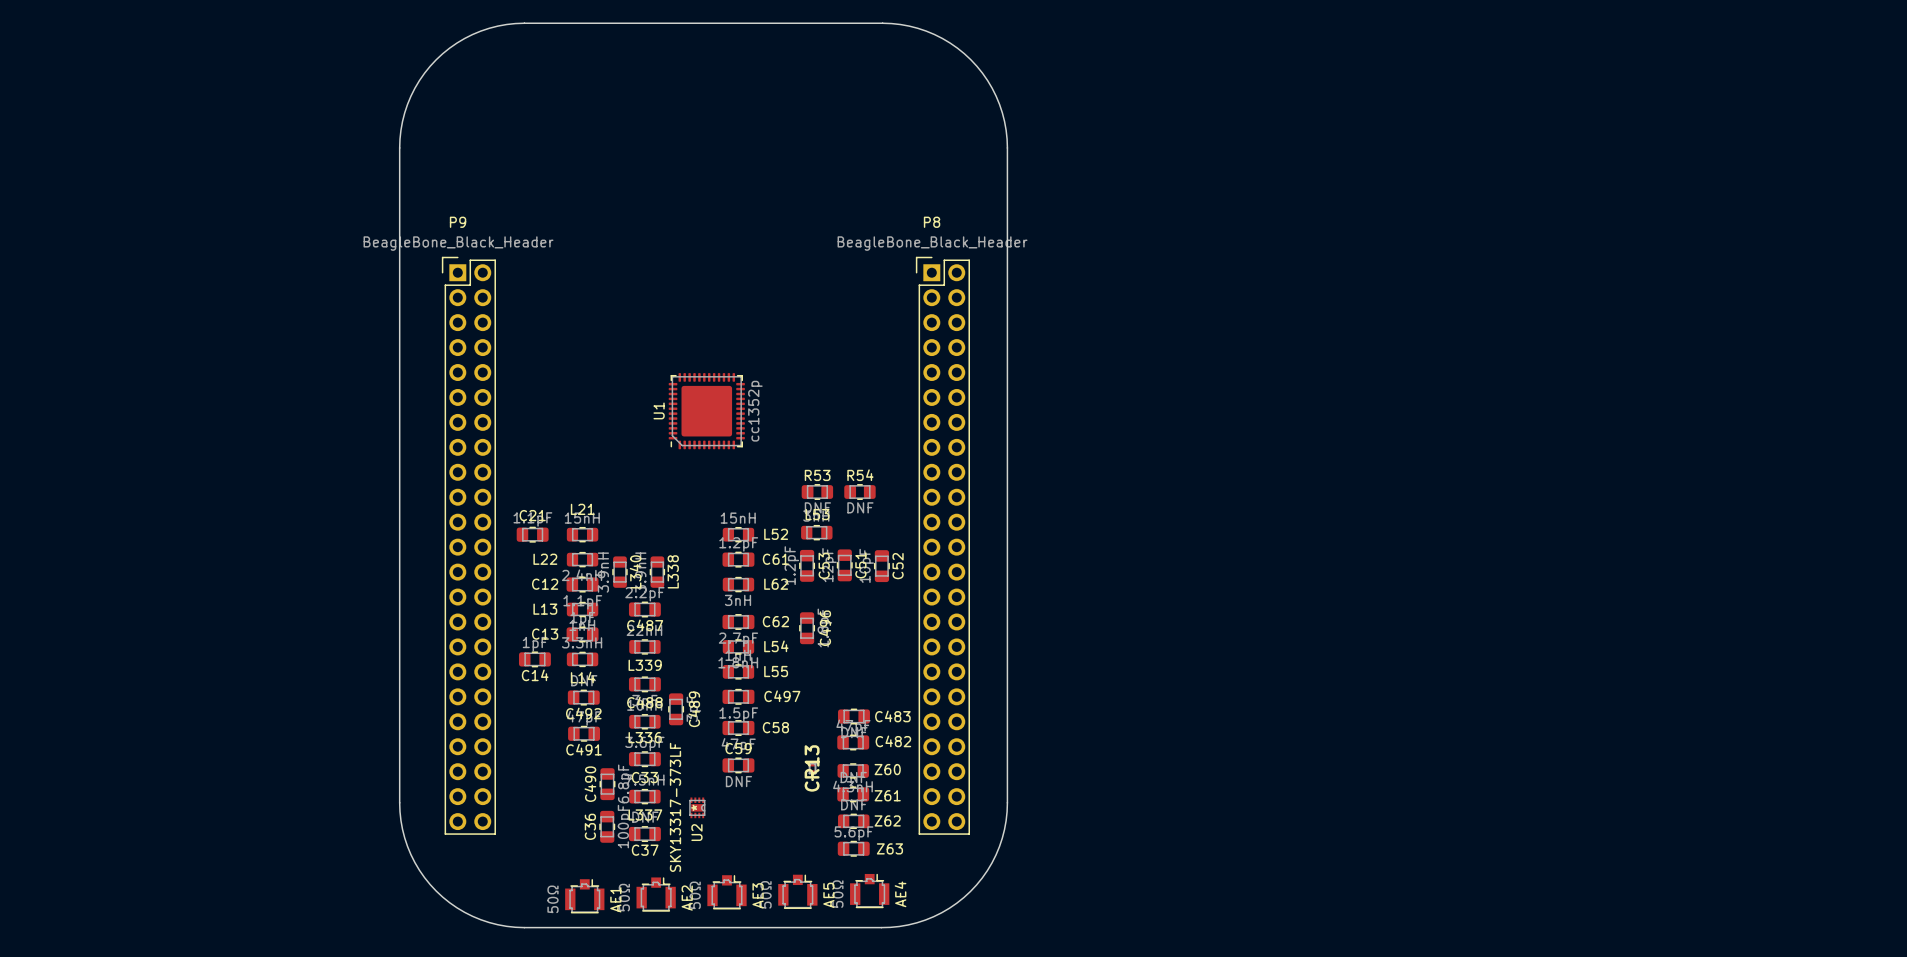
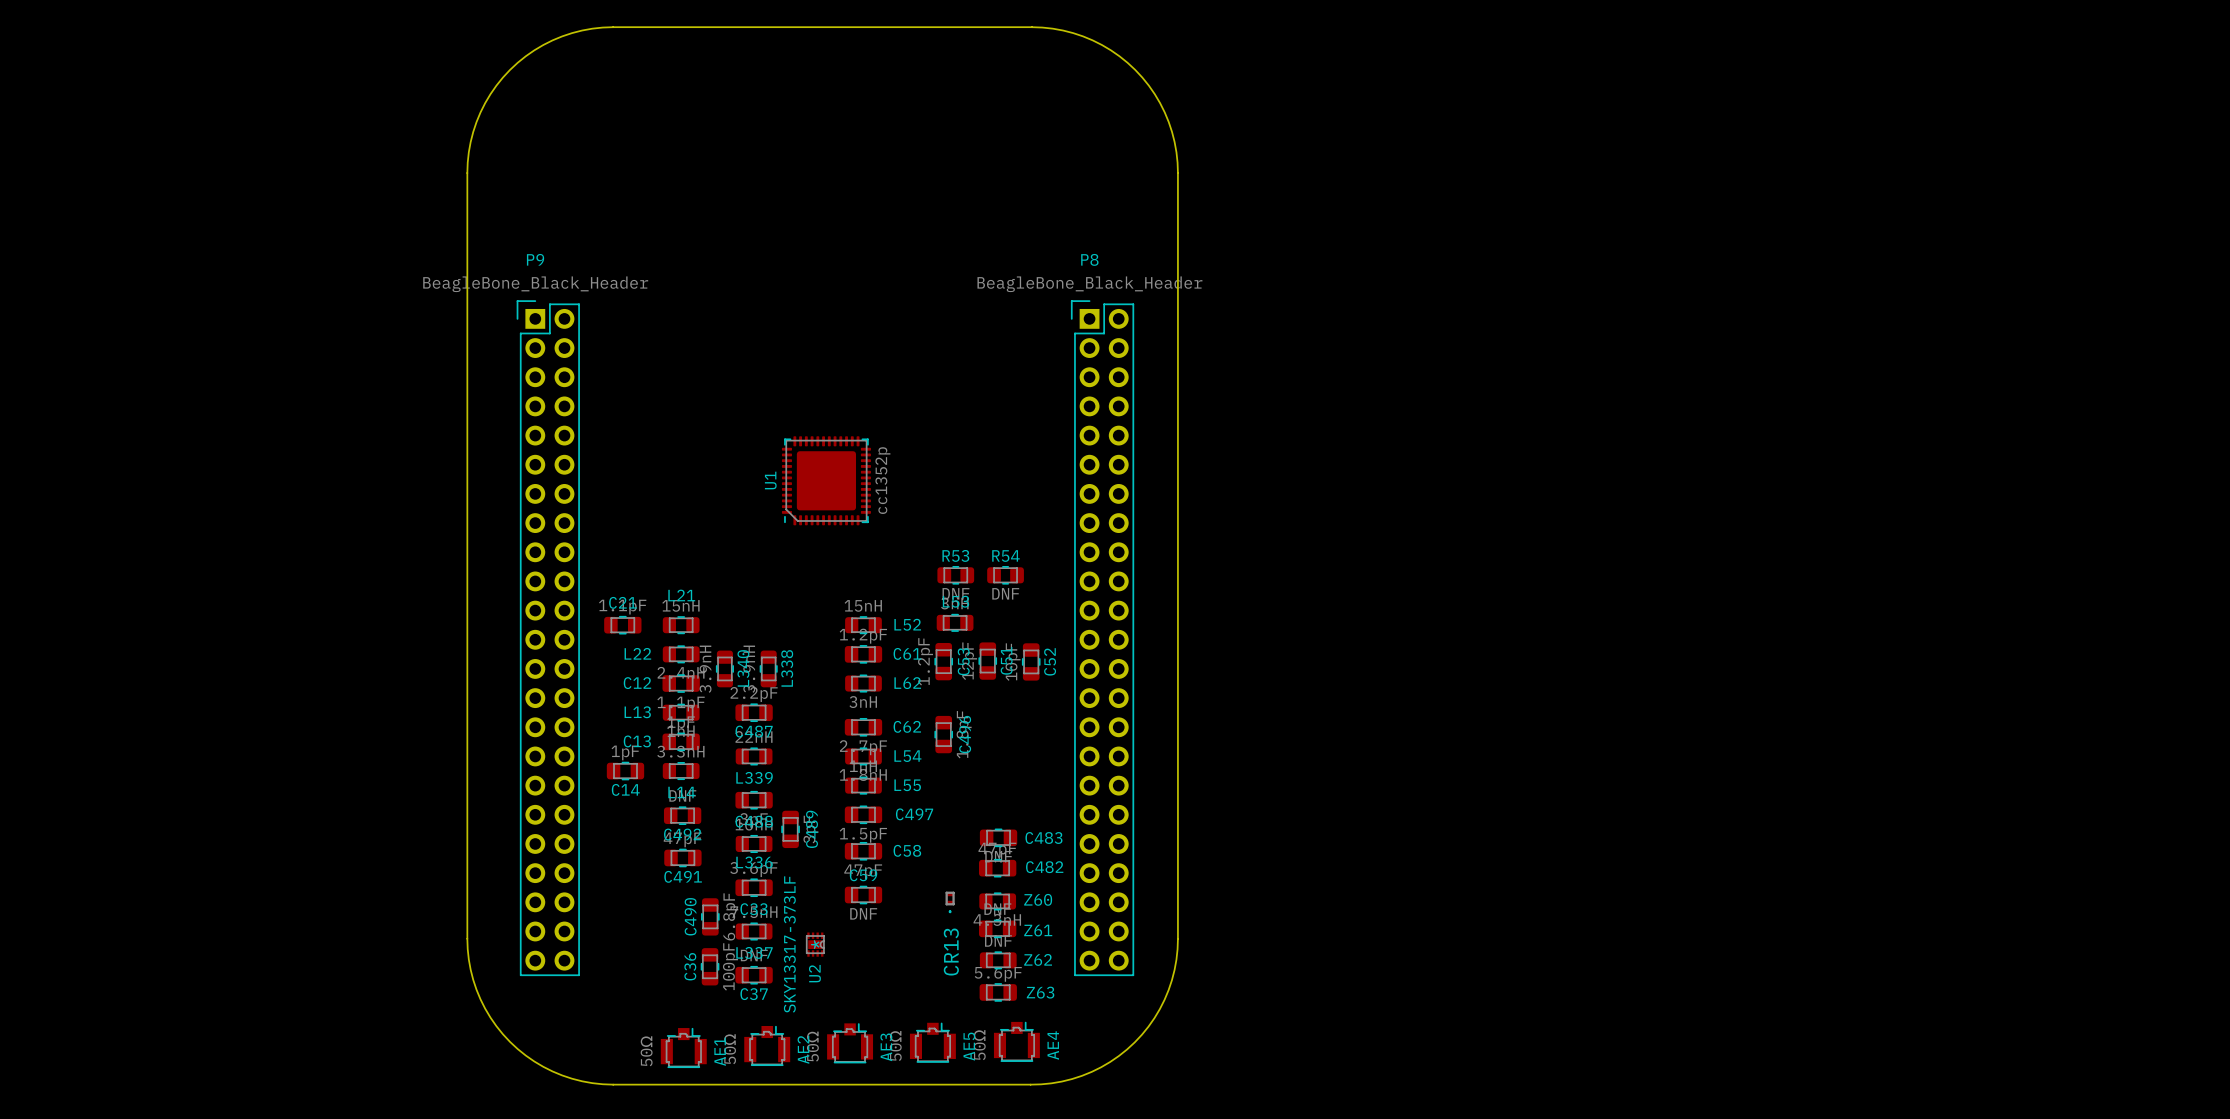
CR13 name position: CR13 (812, 768) -> CR13 (951, 952)

